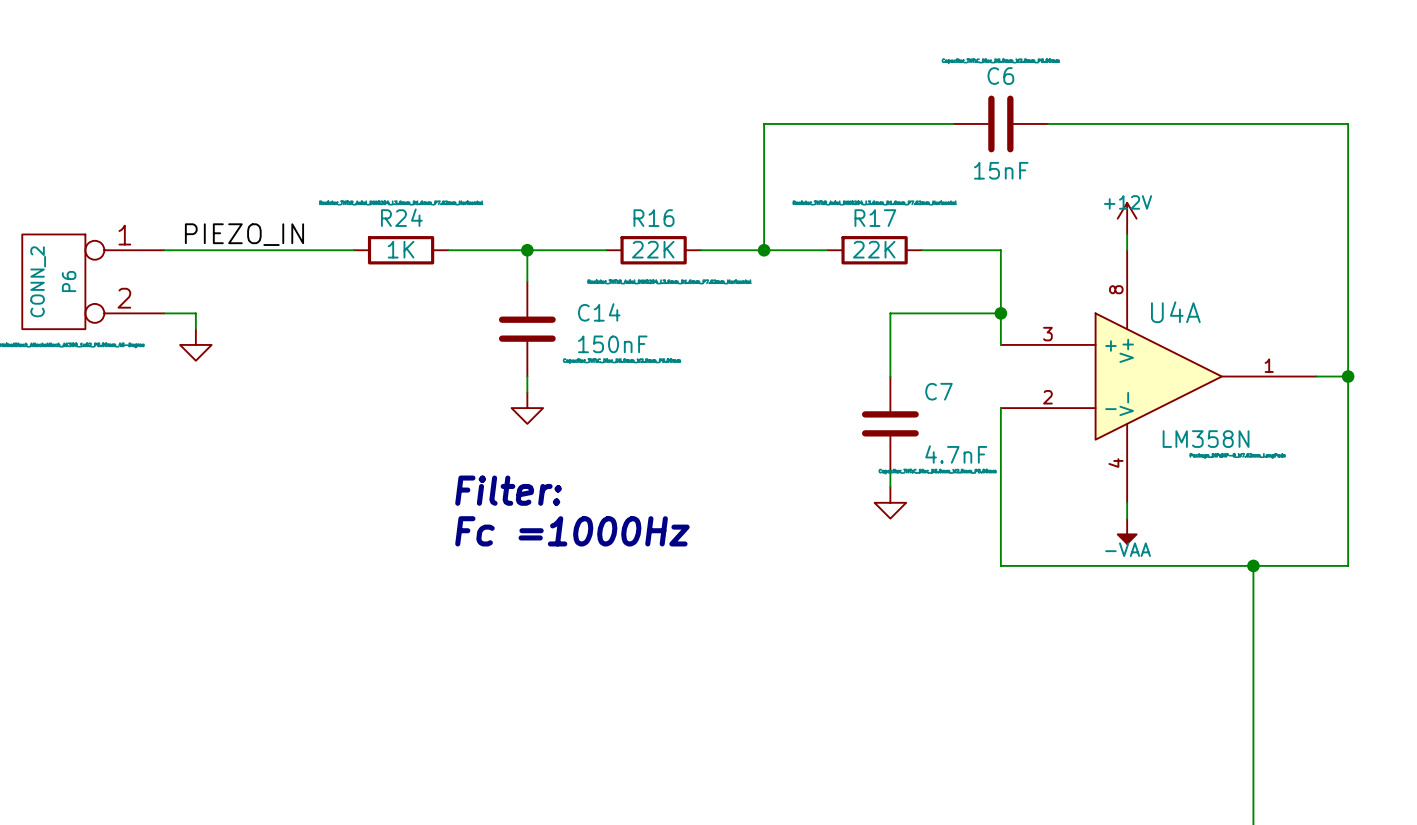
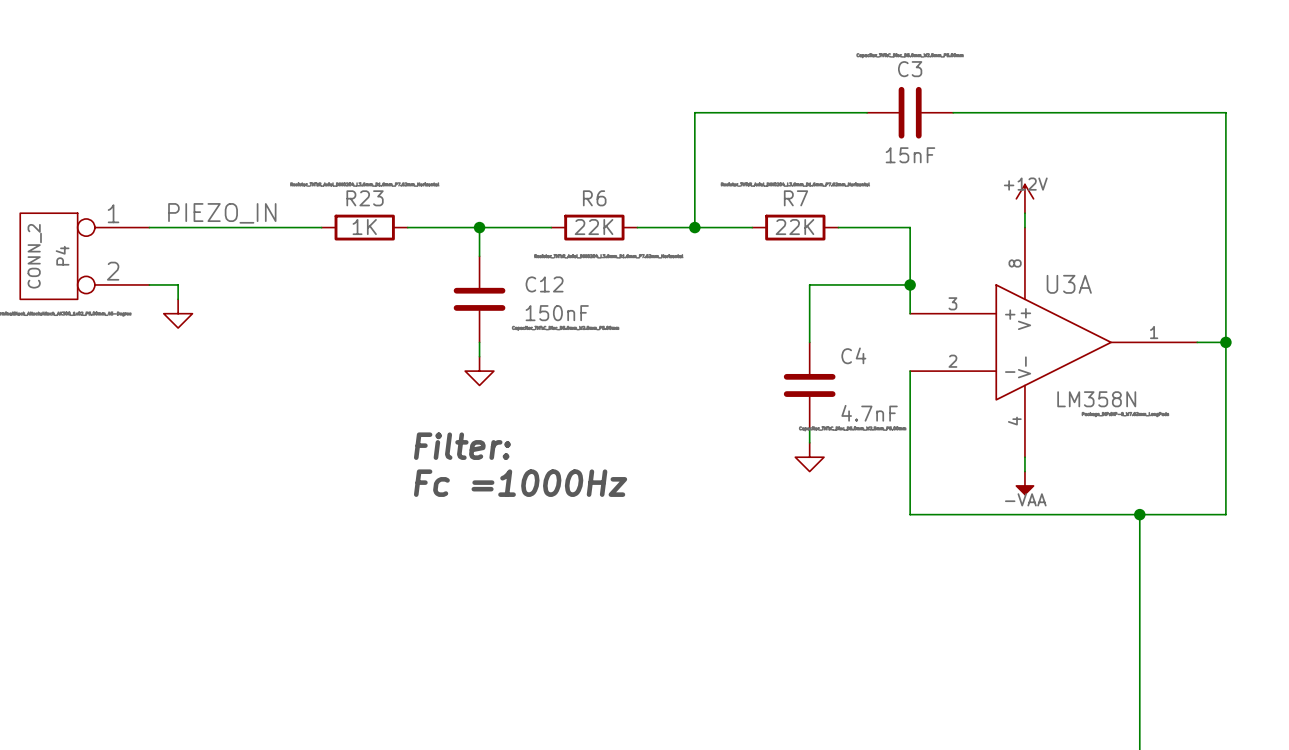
C6 name: C6 (1000, 76) -> C3 (910, 69)
R24 name: R24 (401, 217) -> R23 (365, 198)
R16 name: R16 (654, 218) -> R6 (594, 198)
R17 name: R17 (875, 218) -> R7 (795, 198)
P6 name: P6 (69, 281) -> P4 (62, 255)
C14 name: C14 (599, 312) -> C12 (544, 284)
U4A name: U4A (1175, 312) -> U3A (1069, 284)
C7 name: C7 (938, 391) -> C4 (853, 355)

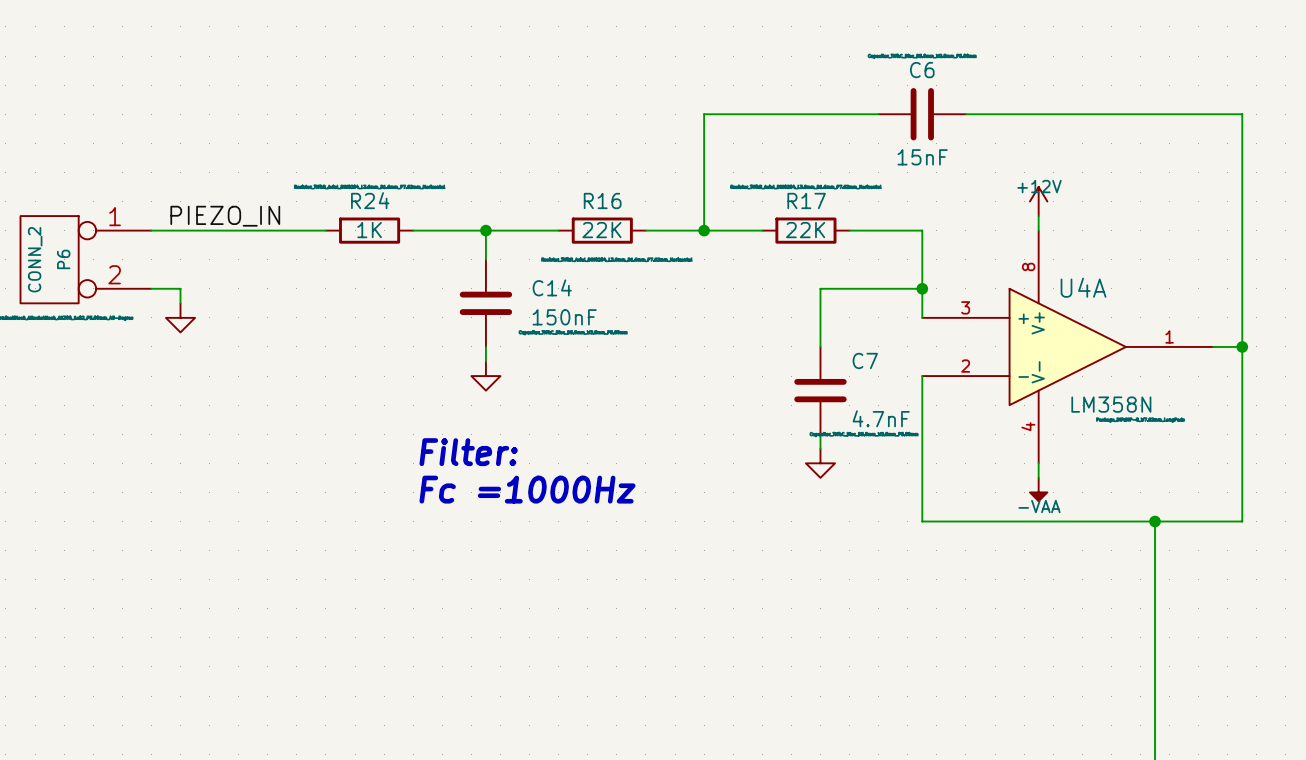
C3 name: C3 (910, 69) -> C6 (922, 70)
R23 name: R23 (365, 198) -> R24 (370, 200)
R6 name: R6 (594, 198) -> R16 (602, 200)
R7 name: R7 (795, 198) -> R17 (806, 200)
P4 name: P4 (62, 255) -> P6 (63, 259)
C12 name: C12 (544, 284) -> C14 (552, 287)
U3A name: U3A (1069, 284) -> U4A (1083, 287)
C4 name: C4 (853, 355) -> C7 (865, 360)

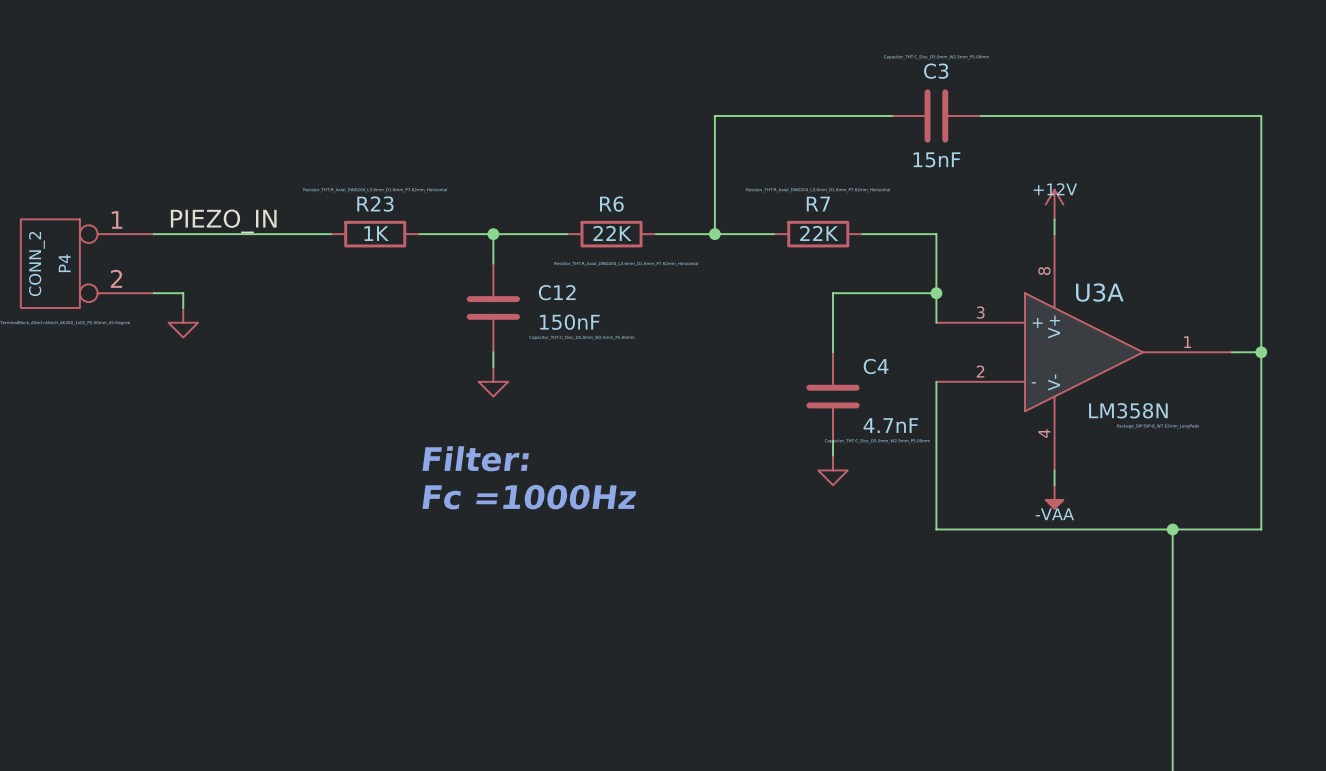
C6 name: C6 (922, 70) -> C3 (936, 71)
R24 name: R24 (370, 200) -> R23 (375, 204)
R16 name: R16 (602, 200) -> R6 (611, 204)
R17 name: R17 (806, 200) -> R7 (818, 204)
P6 name: P6 (63, 259) -> P4 (64, 263)
C14 name: C14 (552, 287) -> C12 (557, 292)
U4A name: U4A (1083, 287) -> U3A (1099, 292)
C7 name: C7 (865, 360) -> C4 (876, 366)

